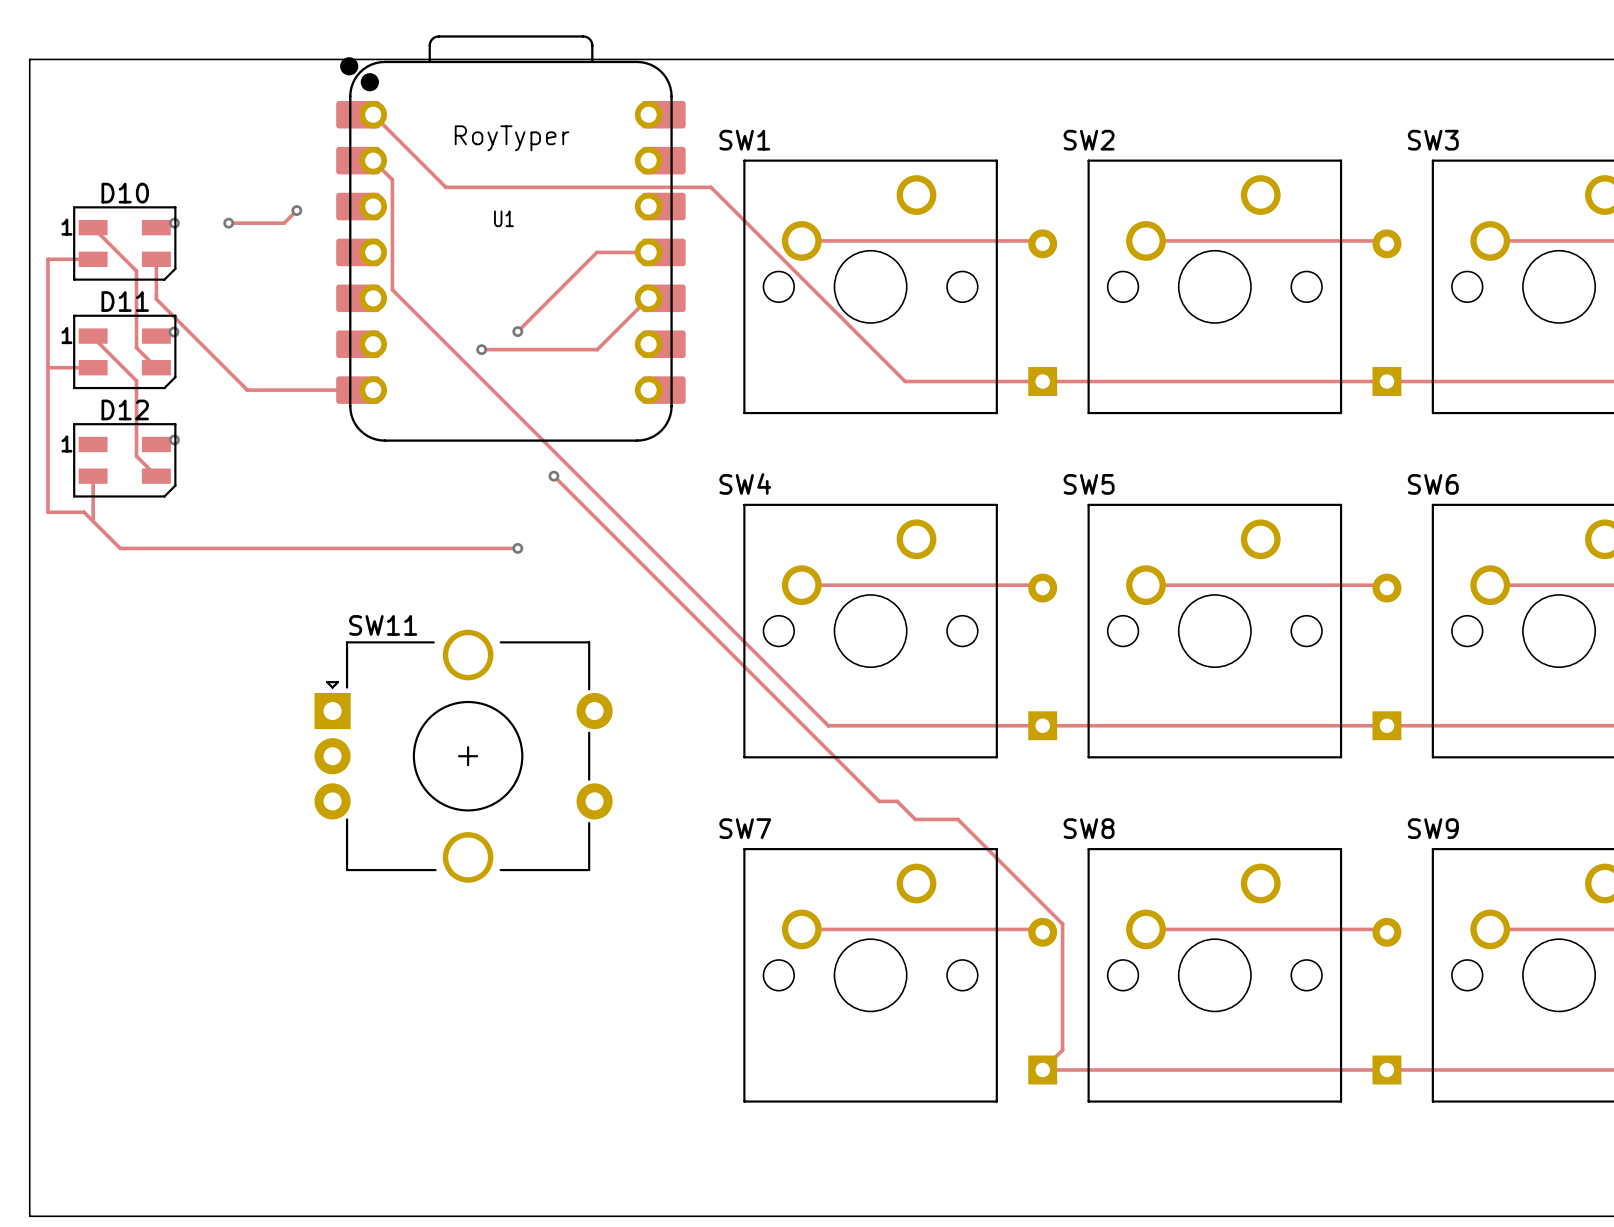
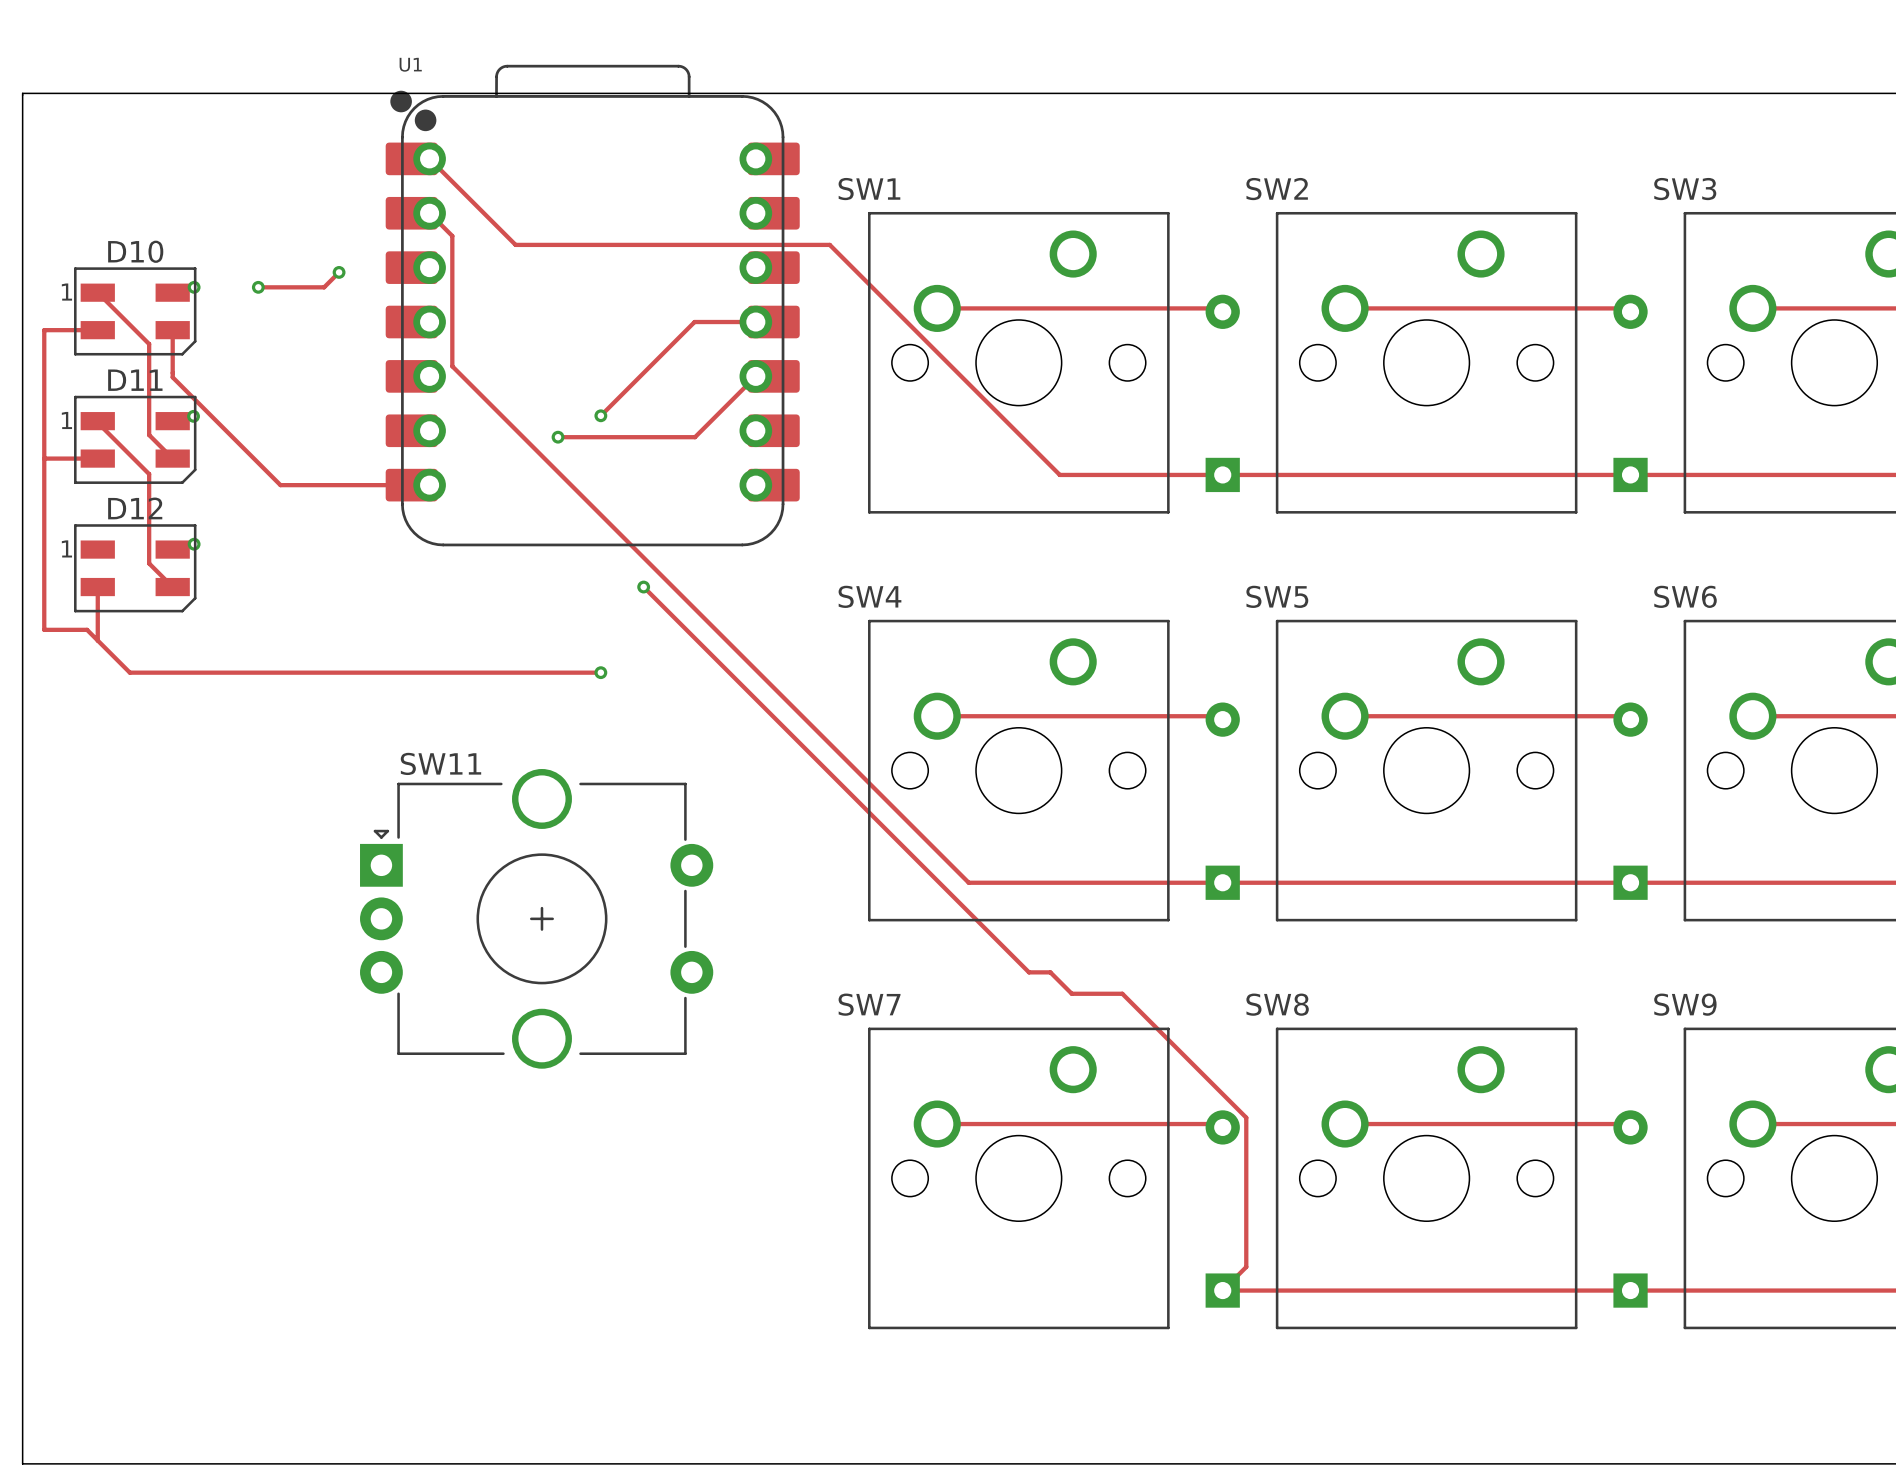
text: RoyTyper (512, 138) -> none
U1 name position: U1 (503, 218) -> U1 (410, 64)

